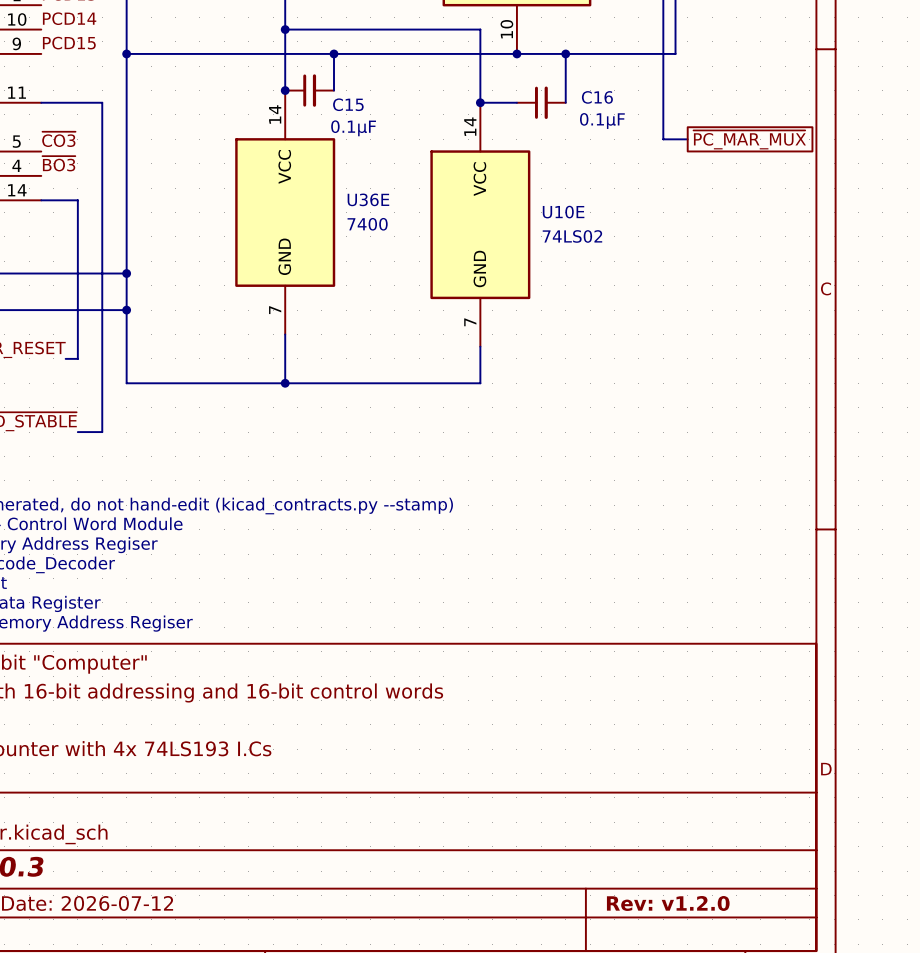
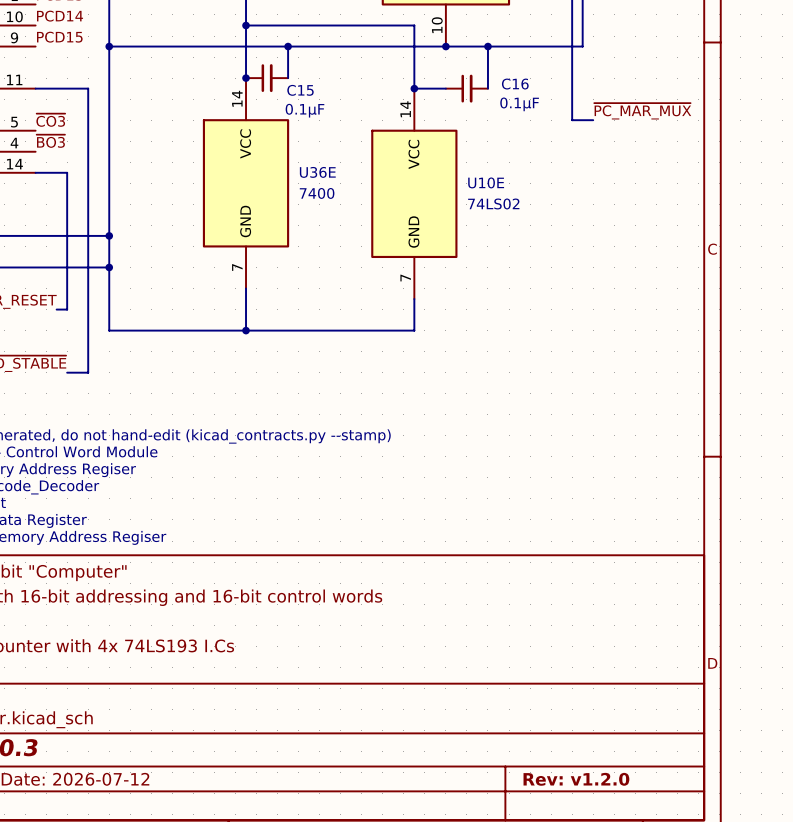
label: none -> ~{PC_MAR_MUX} (642, 111)
global label: ~{PC_MAR_MUX} (749, 139) -> none

